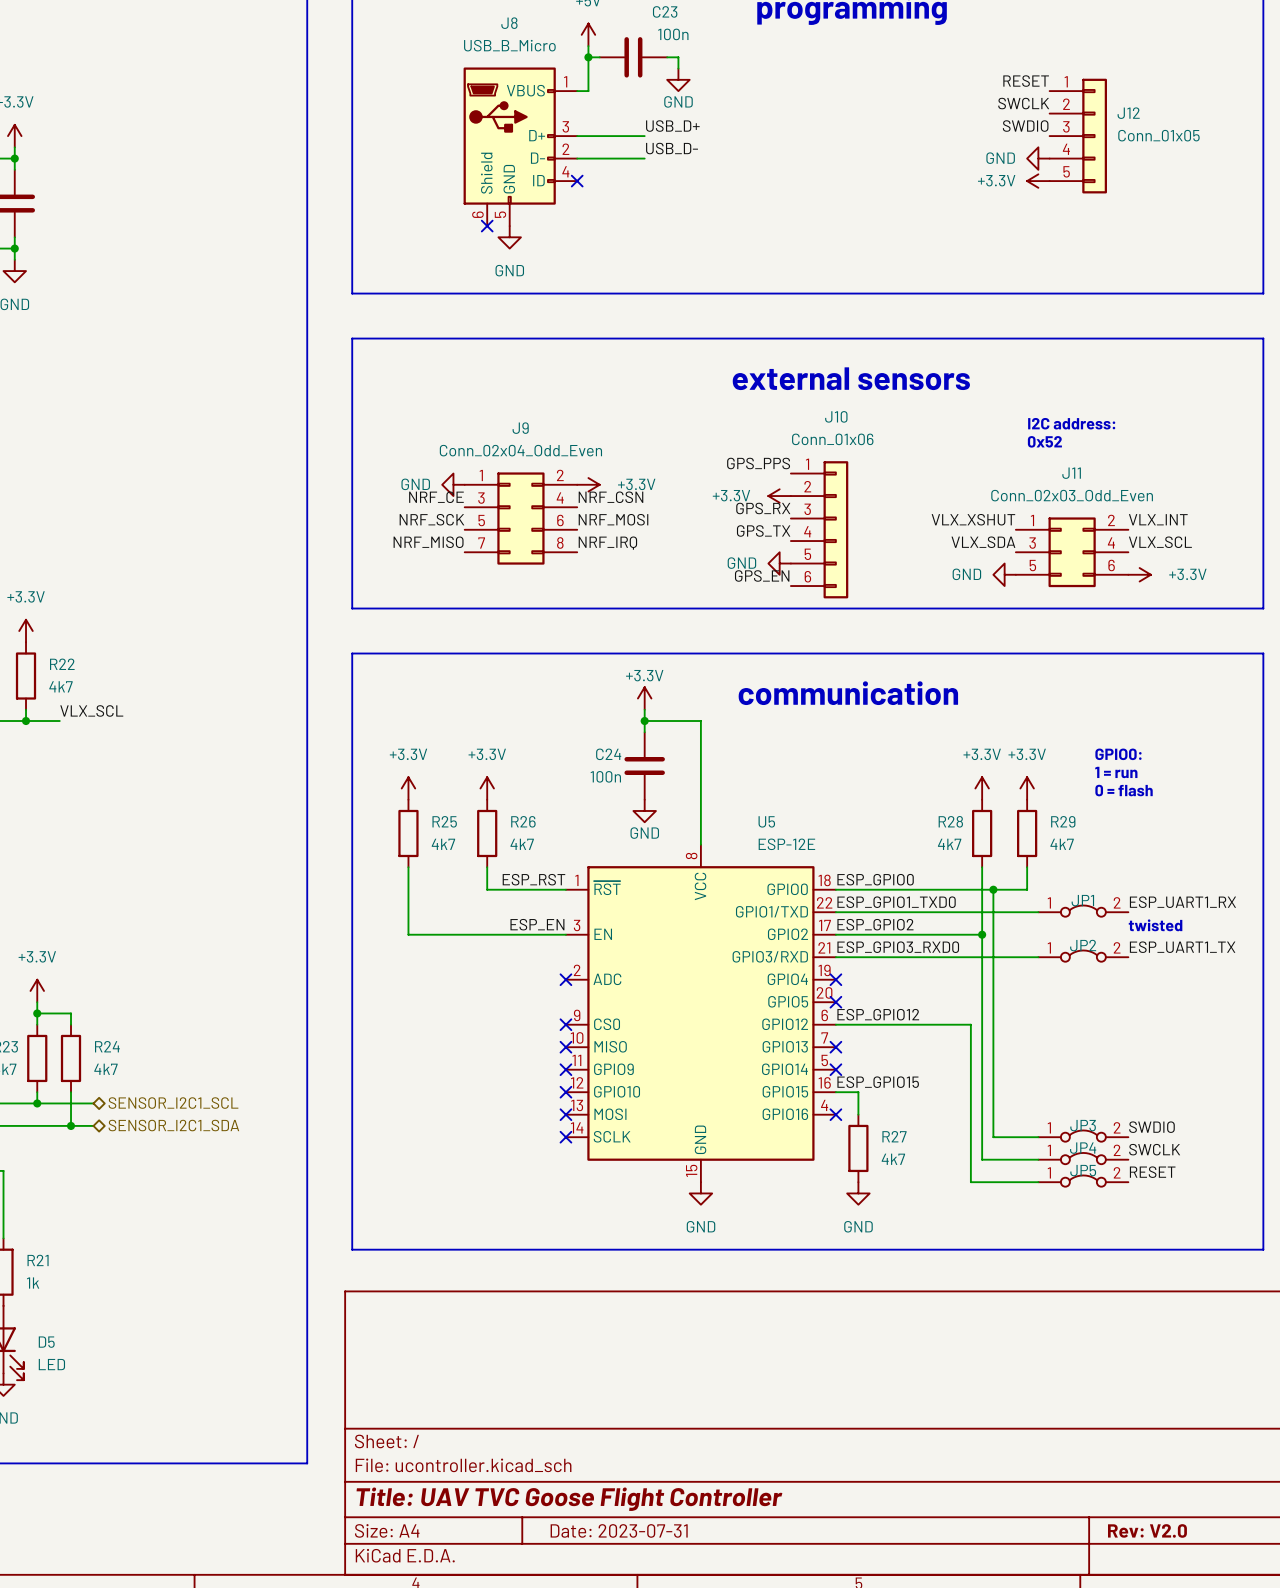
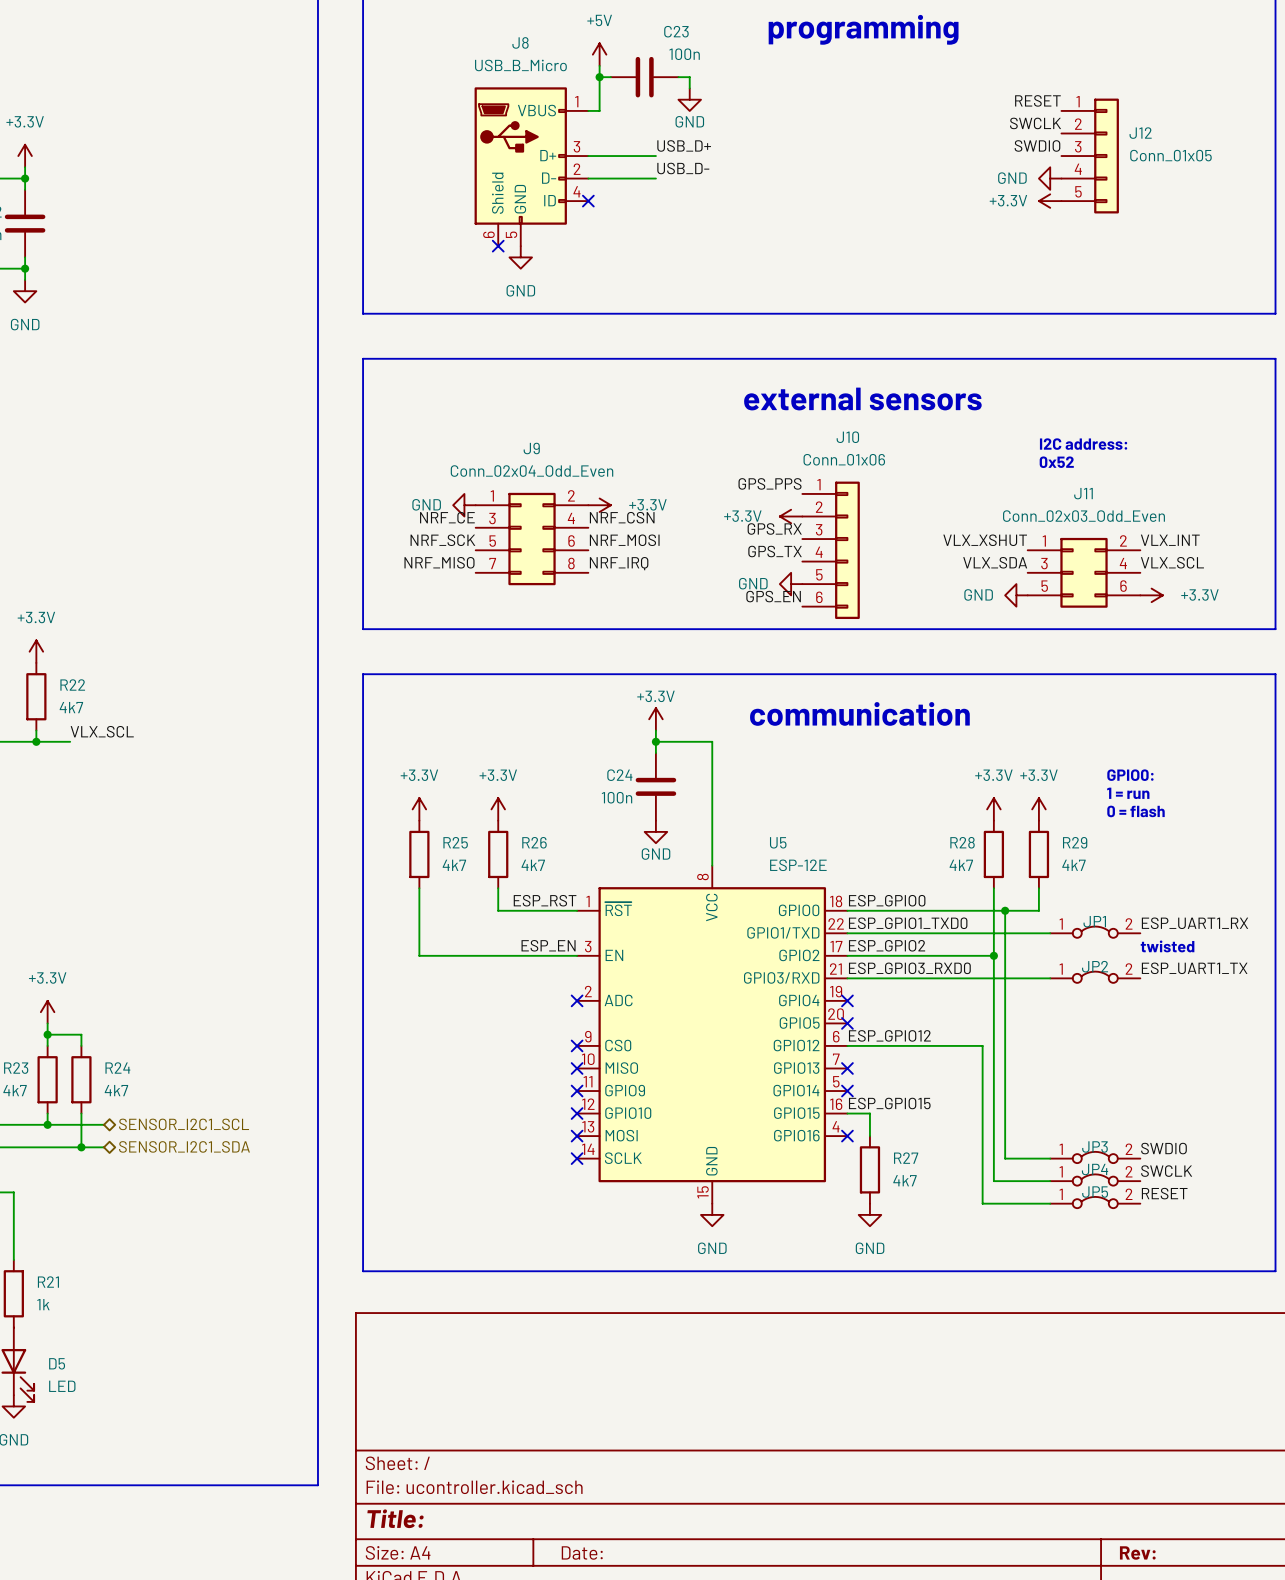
title block: Title: UAV TVC Goose Flight Controller (569, 1499) -> Title: (395, 1518)
title block: Date: 2023-07-31 (619, 1530) -> Date: (582, 1553)
title block: Rev: V2.0 (1147, 1530) -> Rev: (1137, 1552)

